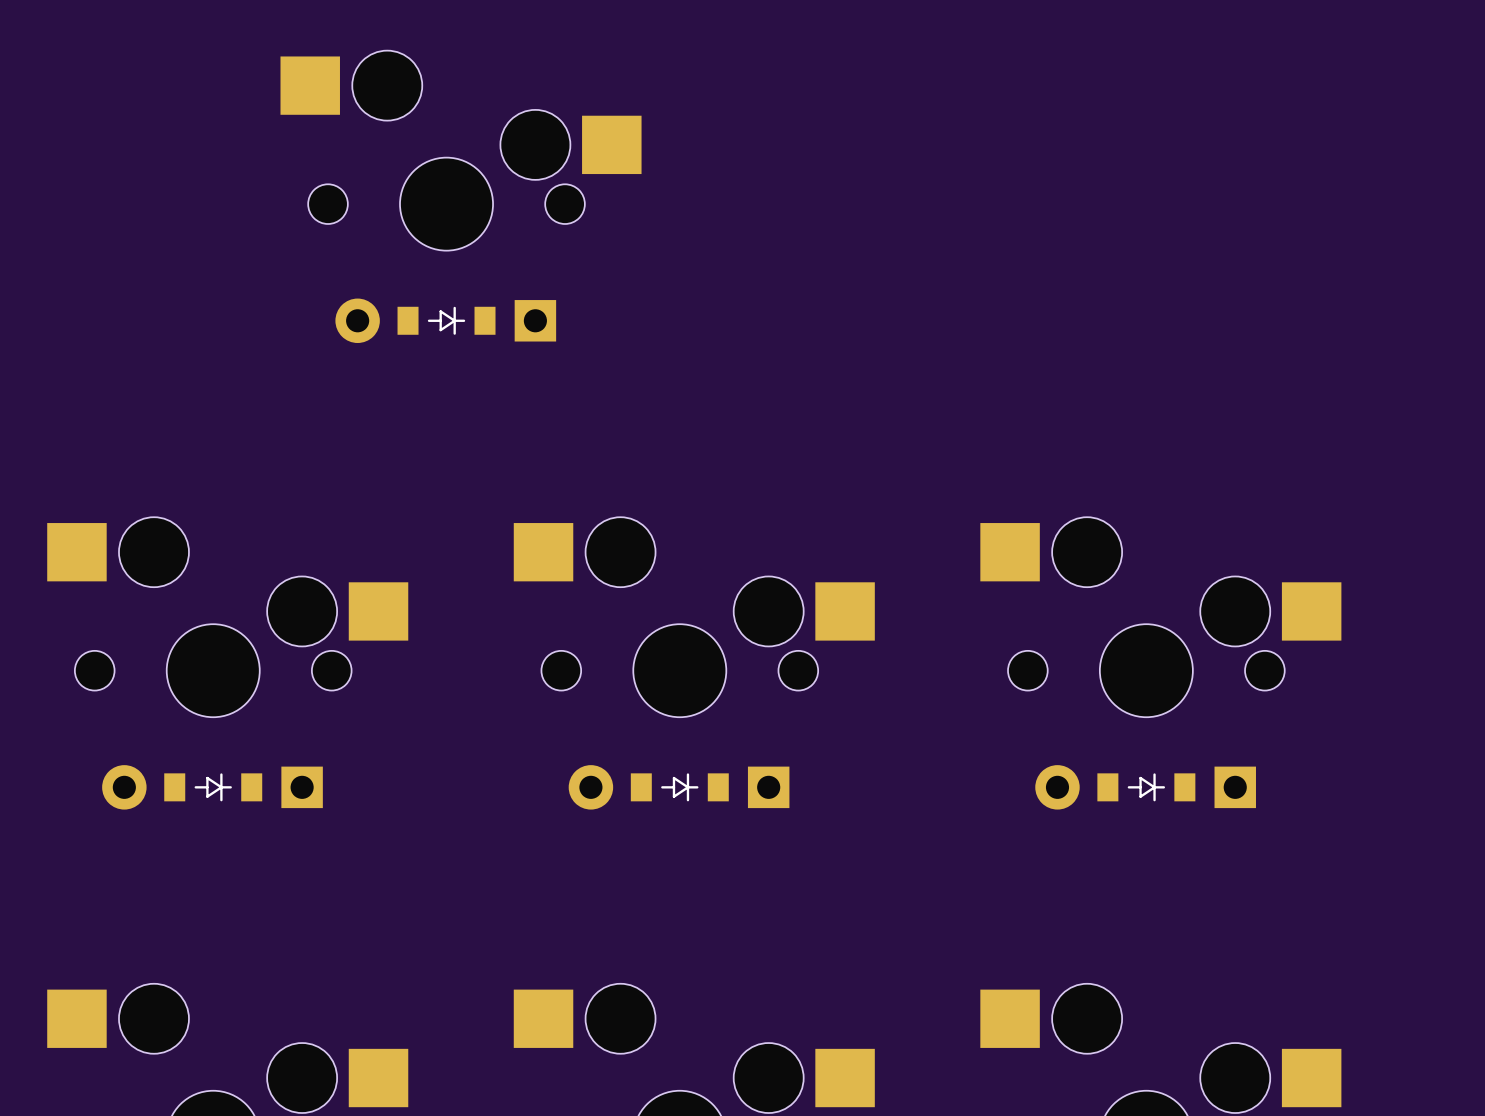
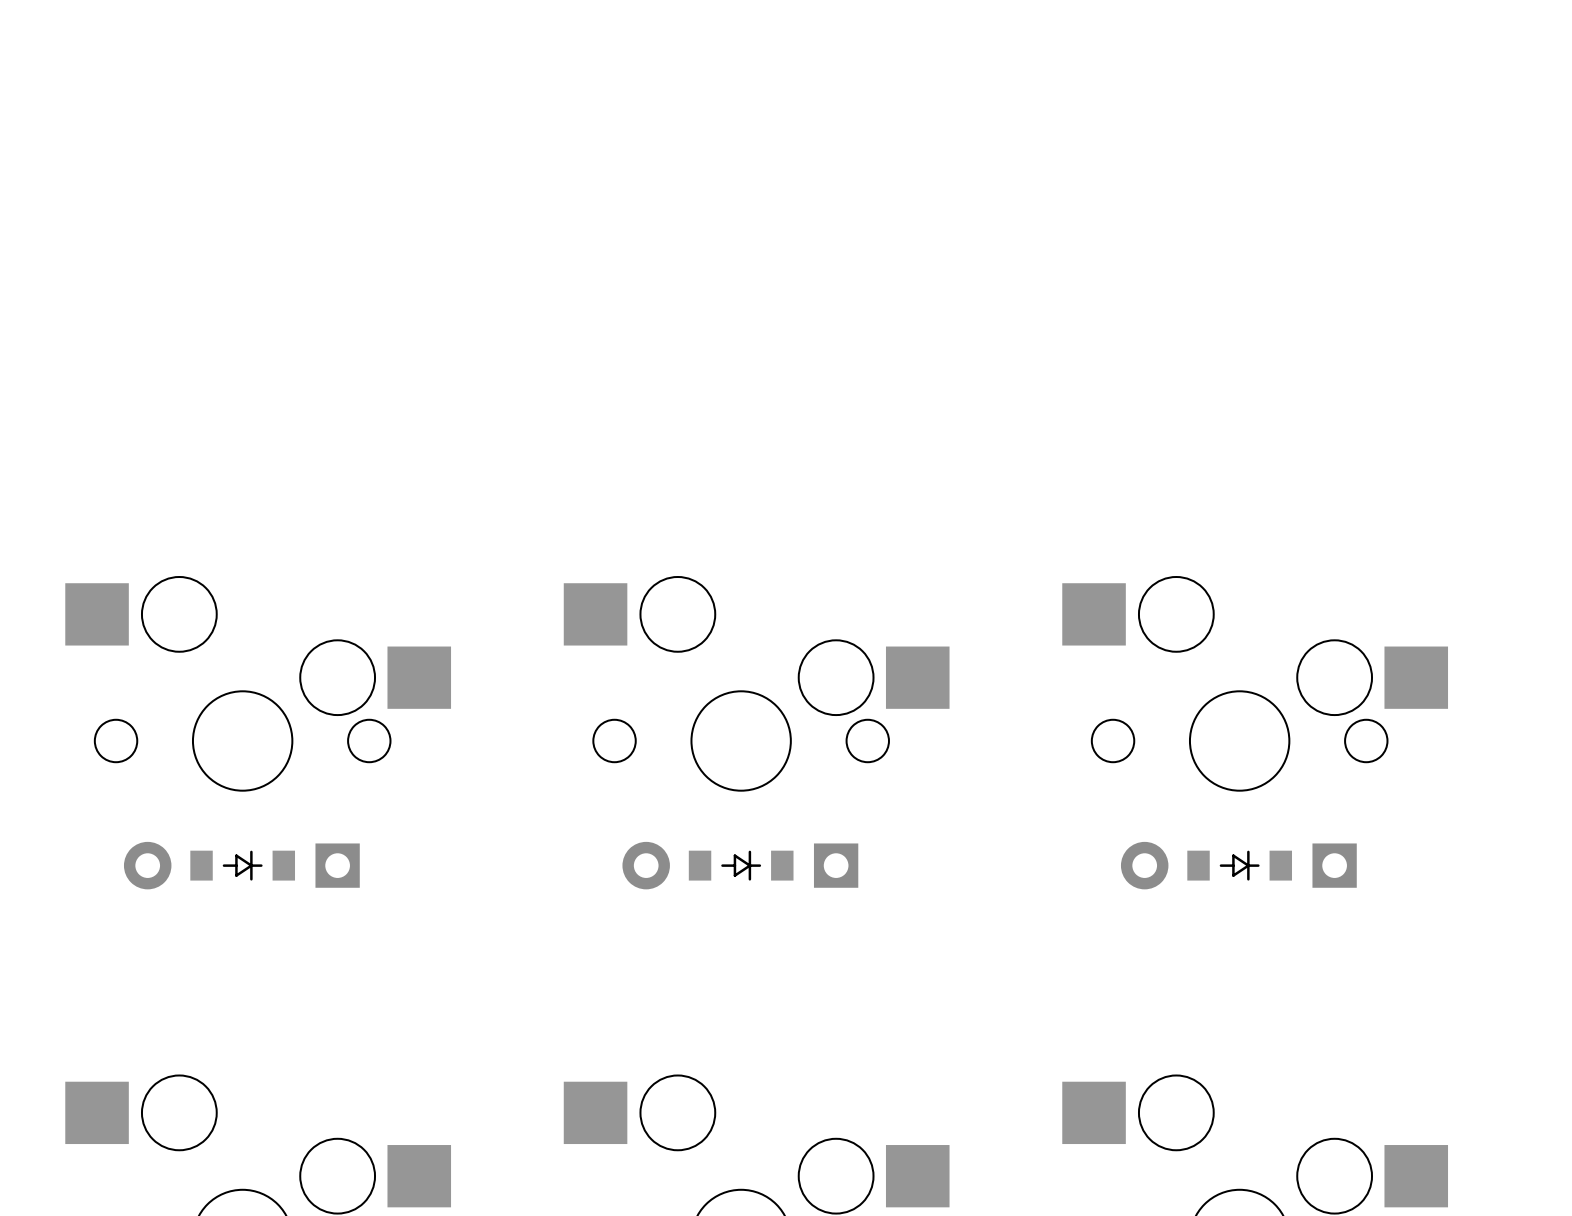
part: (461, 150) -> none
part: (445, 320) -> none

